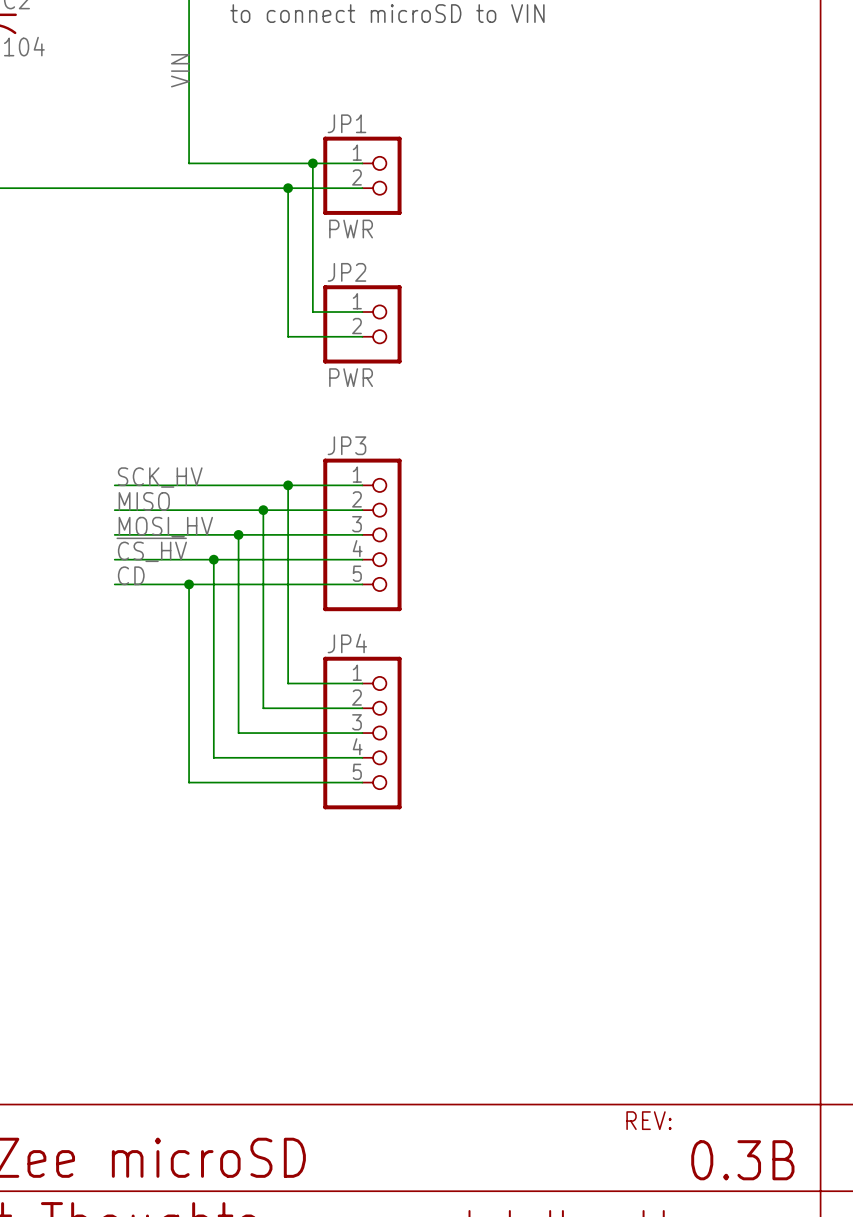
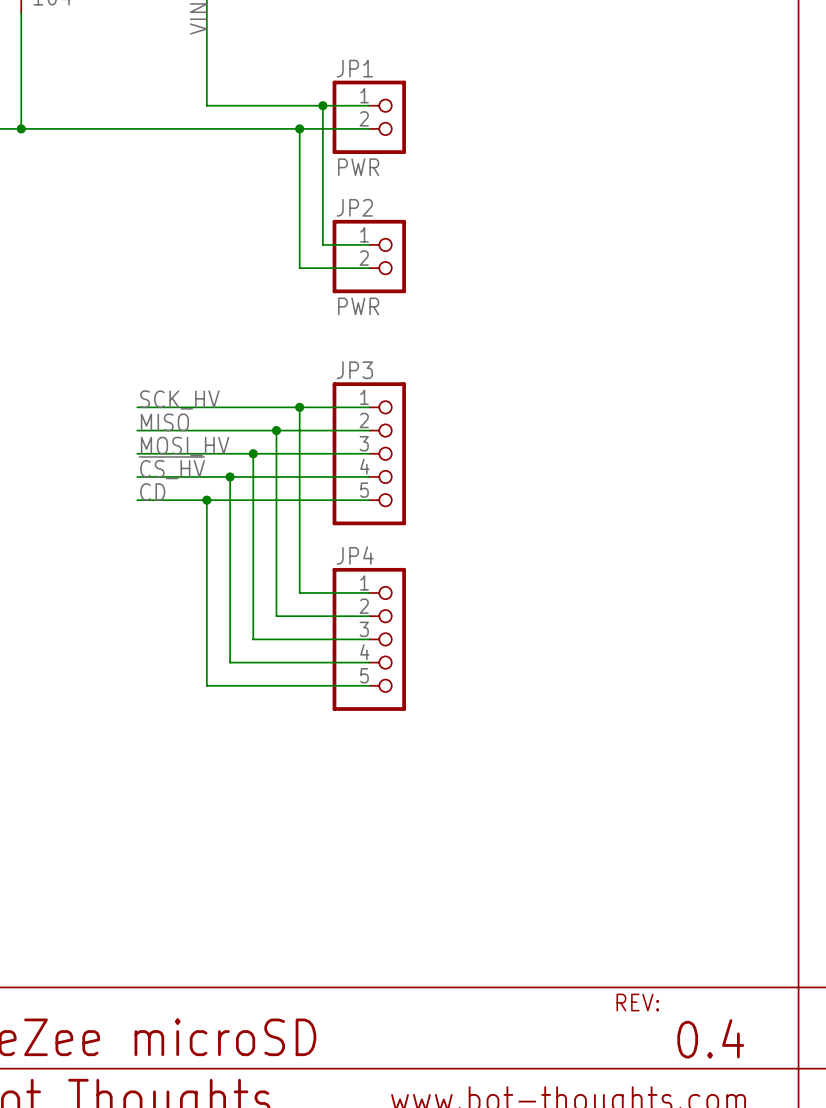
text: 0.3B (742, 1160) -> 0.4 (710, 1038)

